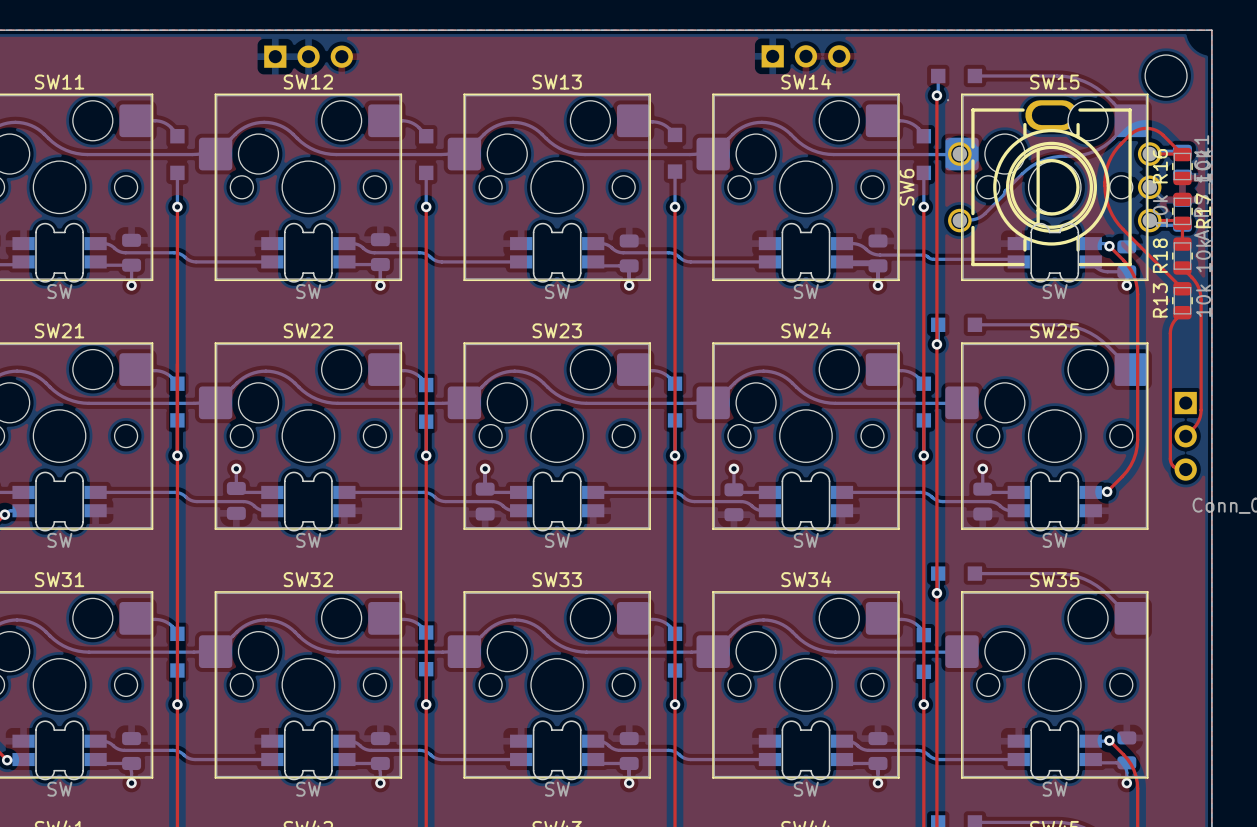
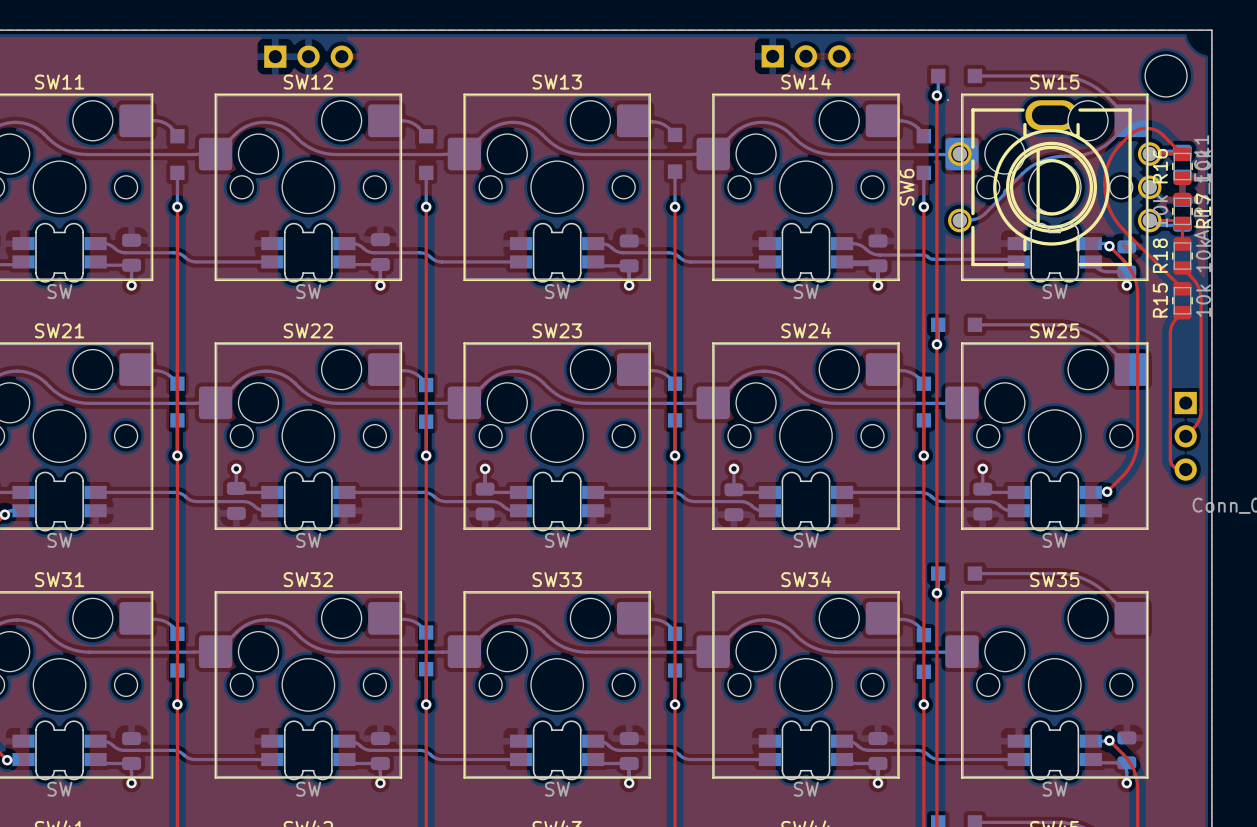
R13 name: R13 (1160, 300) -> R15 (1160, 300)

